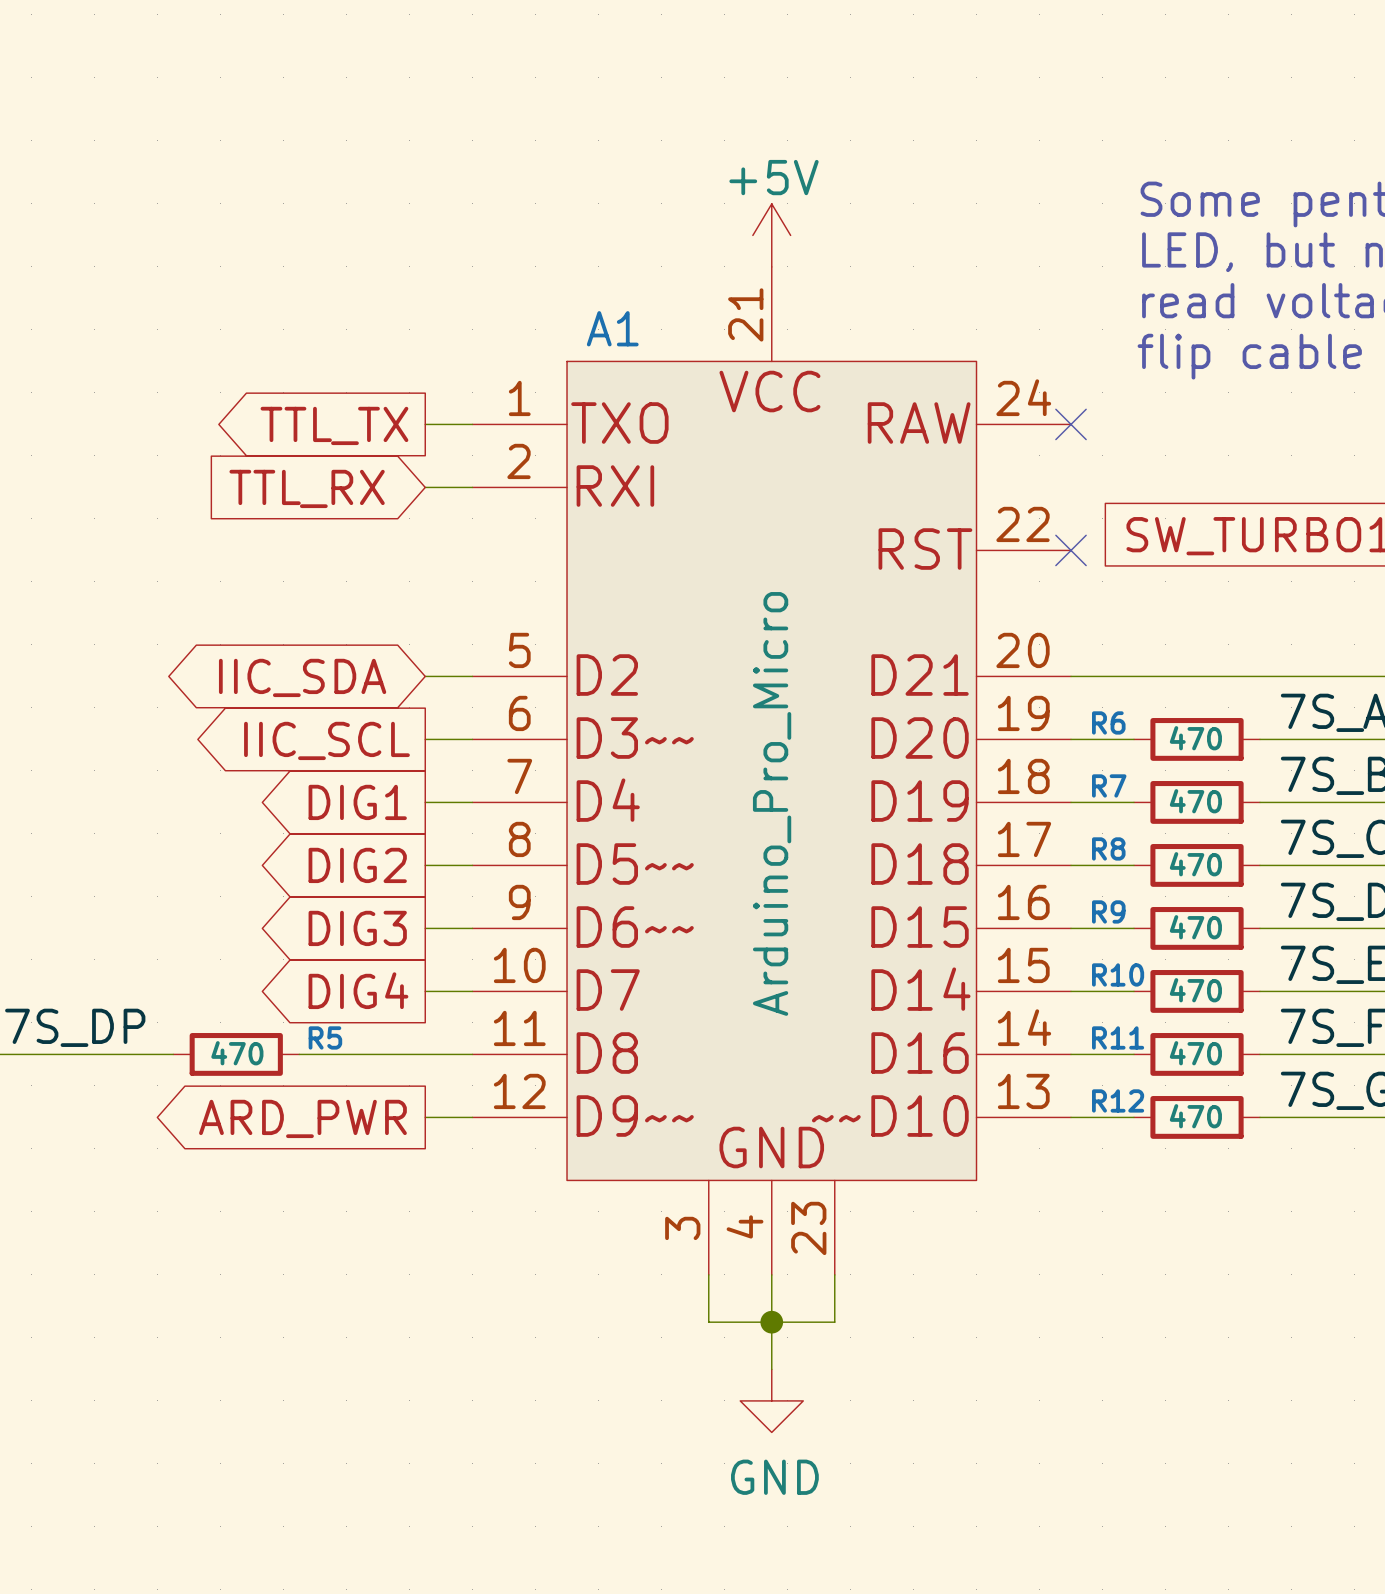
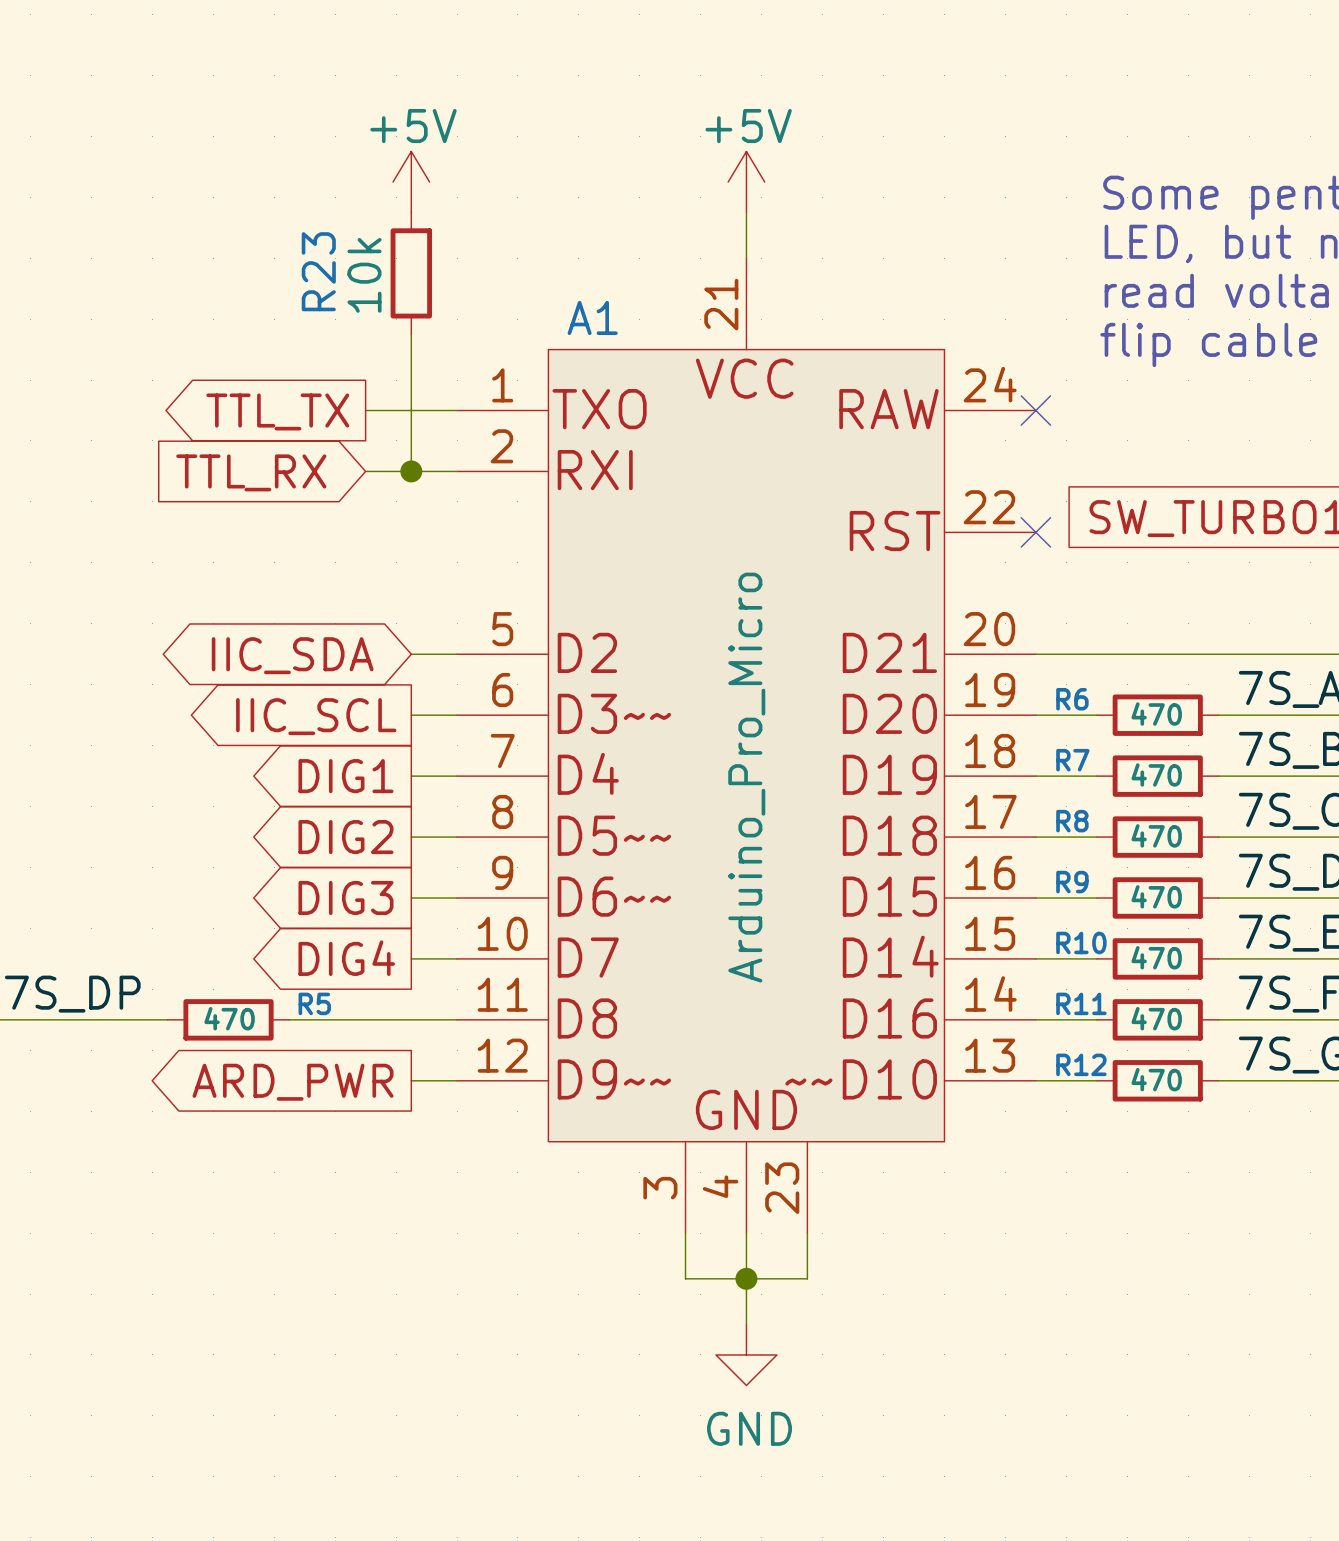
power symbol: none -> +5V (411, 182)
power symbol position: +5V (771, 235) -> +5V (746, 182)
R23: none -> 10k (411, 273)
wire: none -> (411, 334) (411, 471) (365, 471)
wire: none -> (365, 410) (411, 410)
global label position: TTL_TX (334, 425) -> TTL_TX (277, 411)
junction: none -> (411, 471)
global label position: TTL_RX (307, 488) -> TTL_RX (251, 472)

